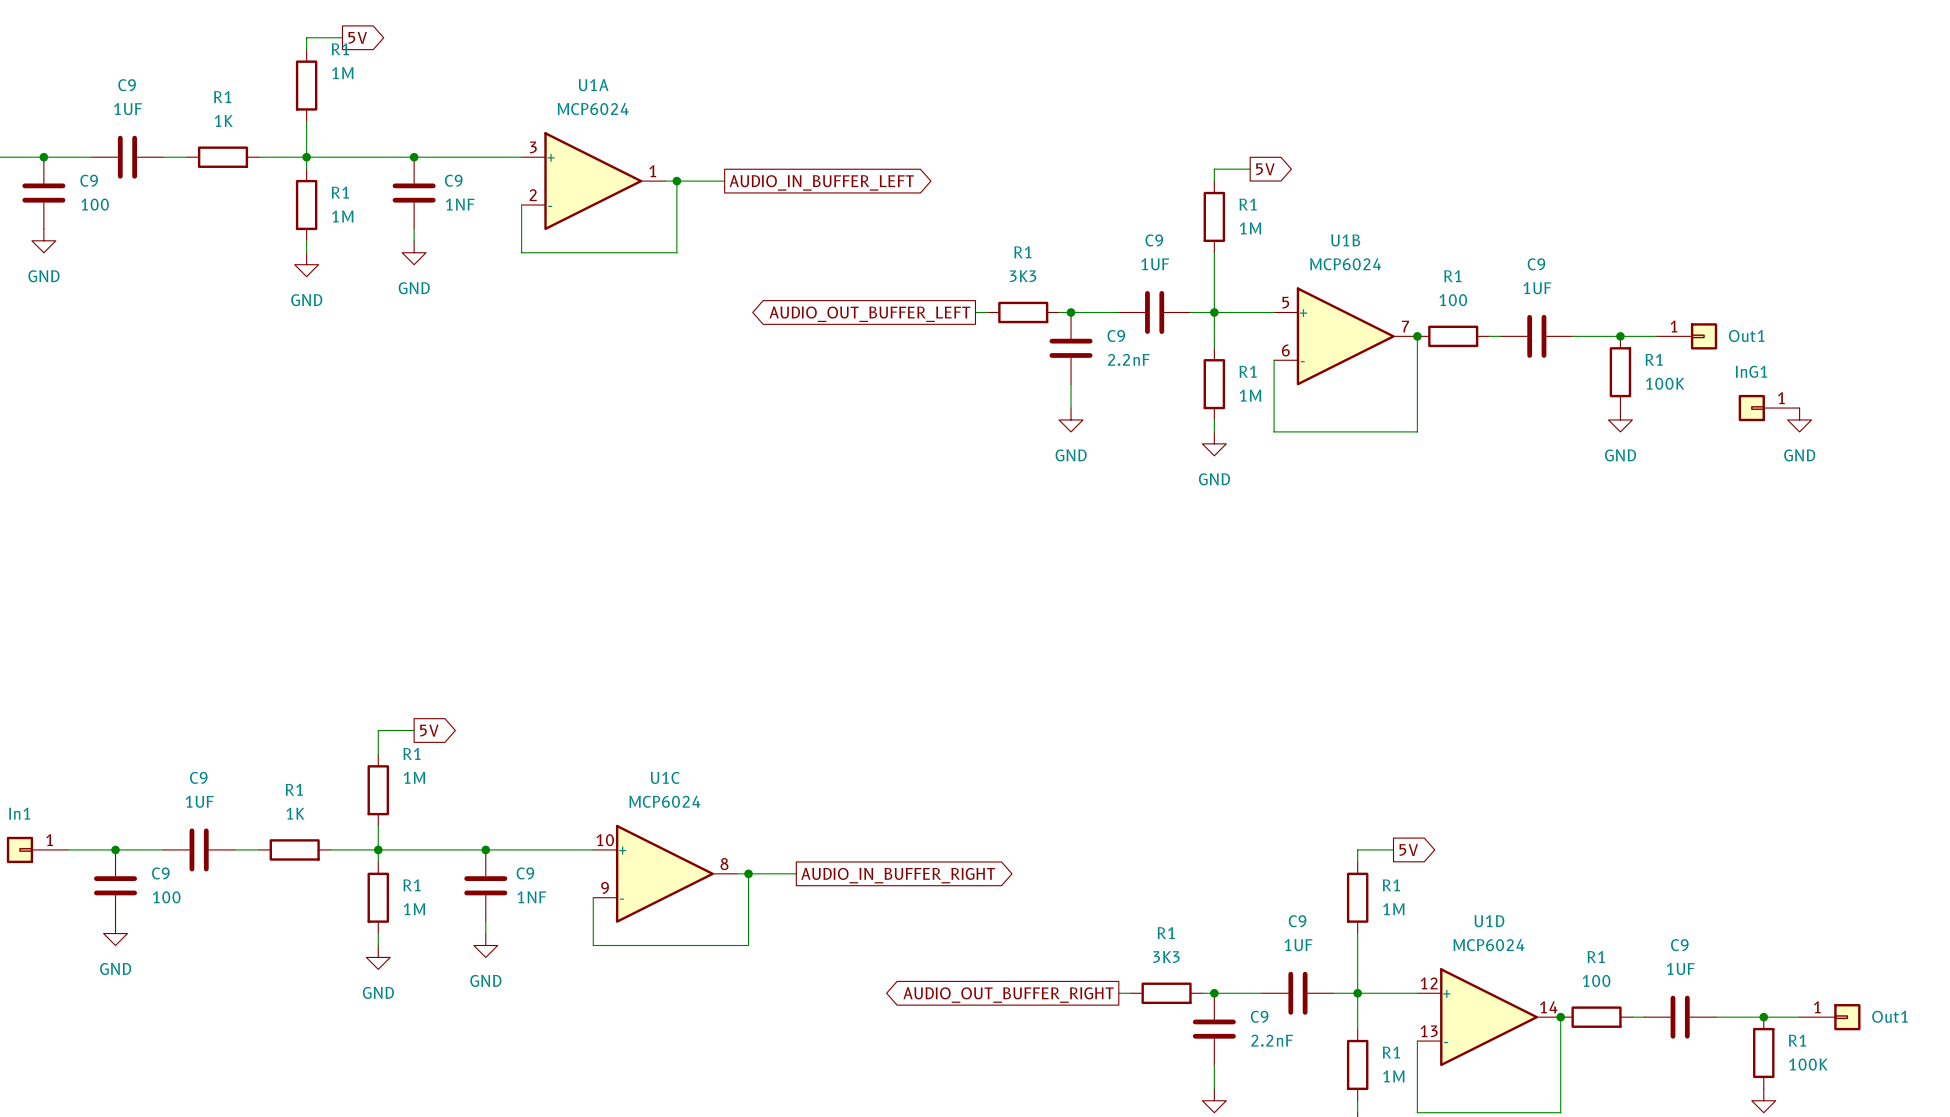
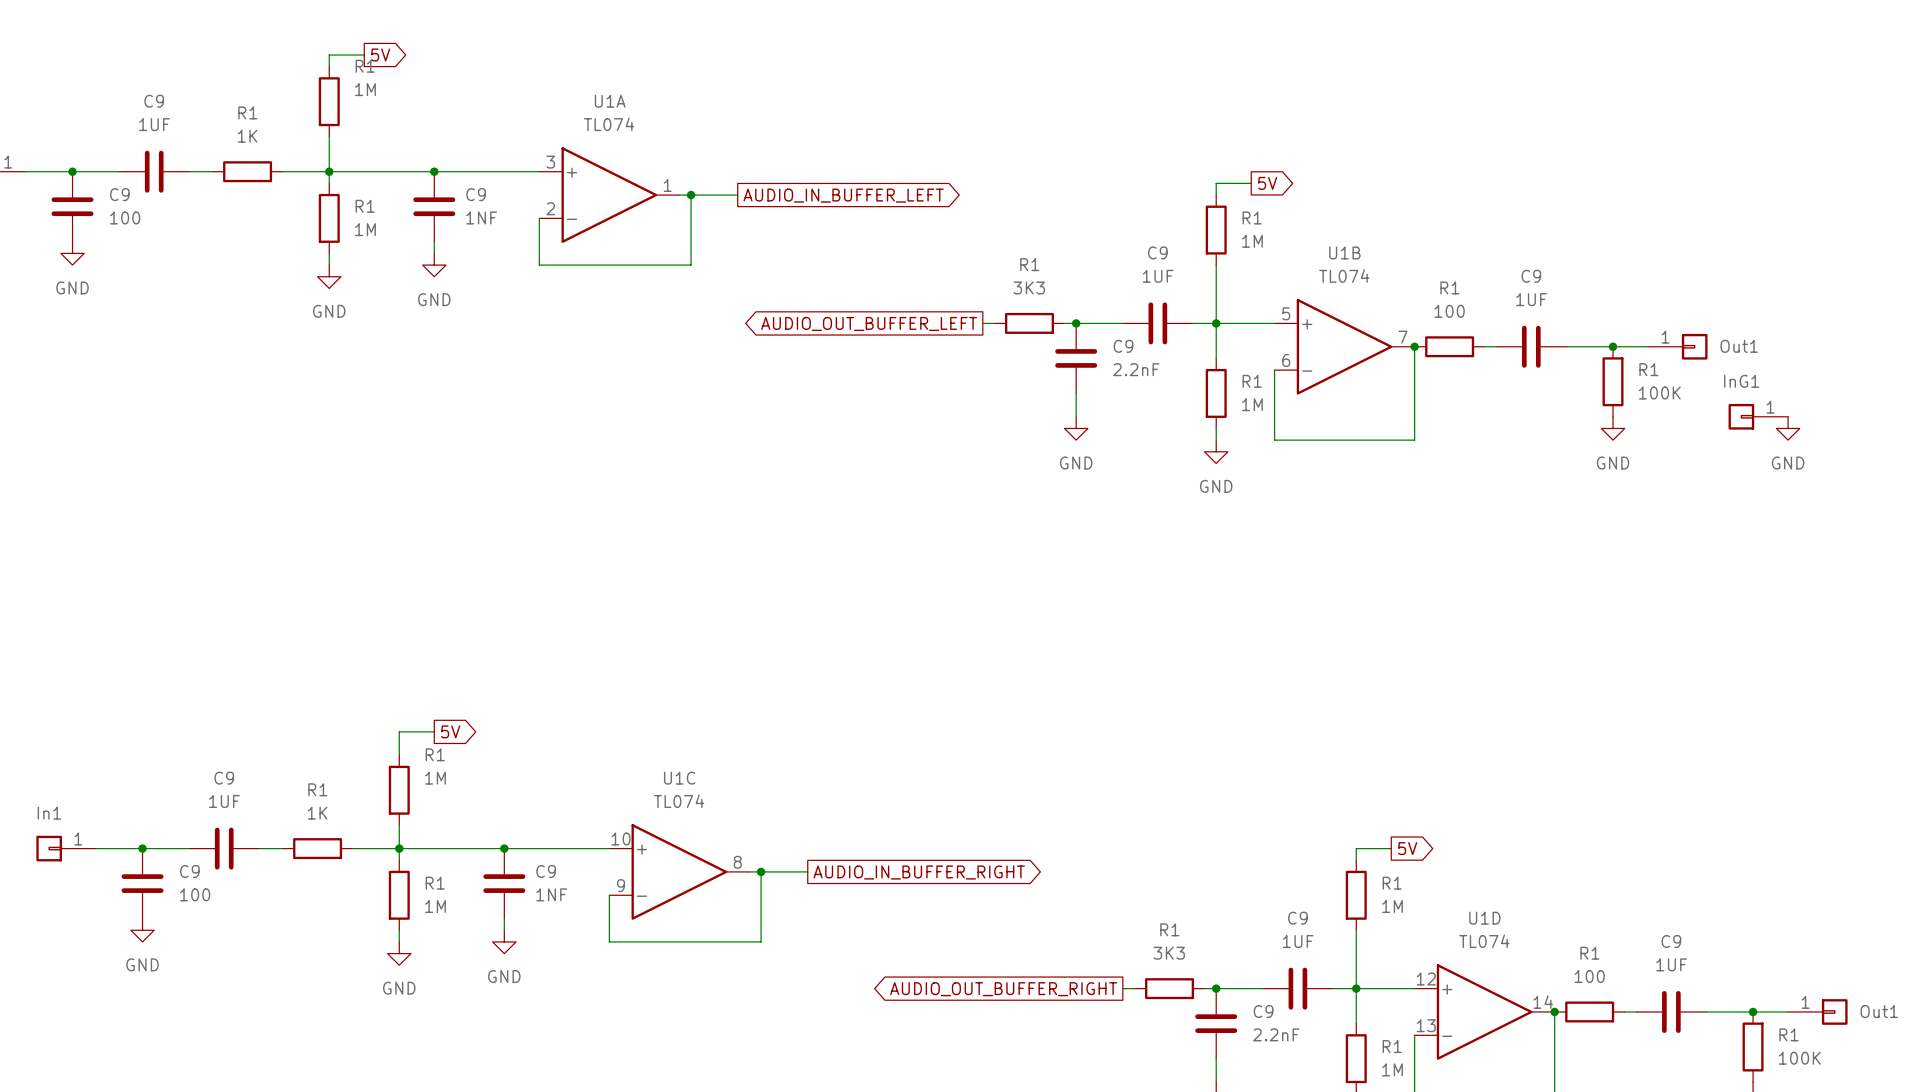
U1A value: MCP6024 (593, 109) -> TL074 (609, 124)
U1B value: MCP6024 (1345, 264) -> TL074 (1344, 276)
U1C value: MCP6024 (664, 801) -> TL074 (679, 801)
U1D value: MCP6024 (1488, 945) -> TL074 (1484, 941)

